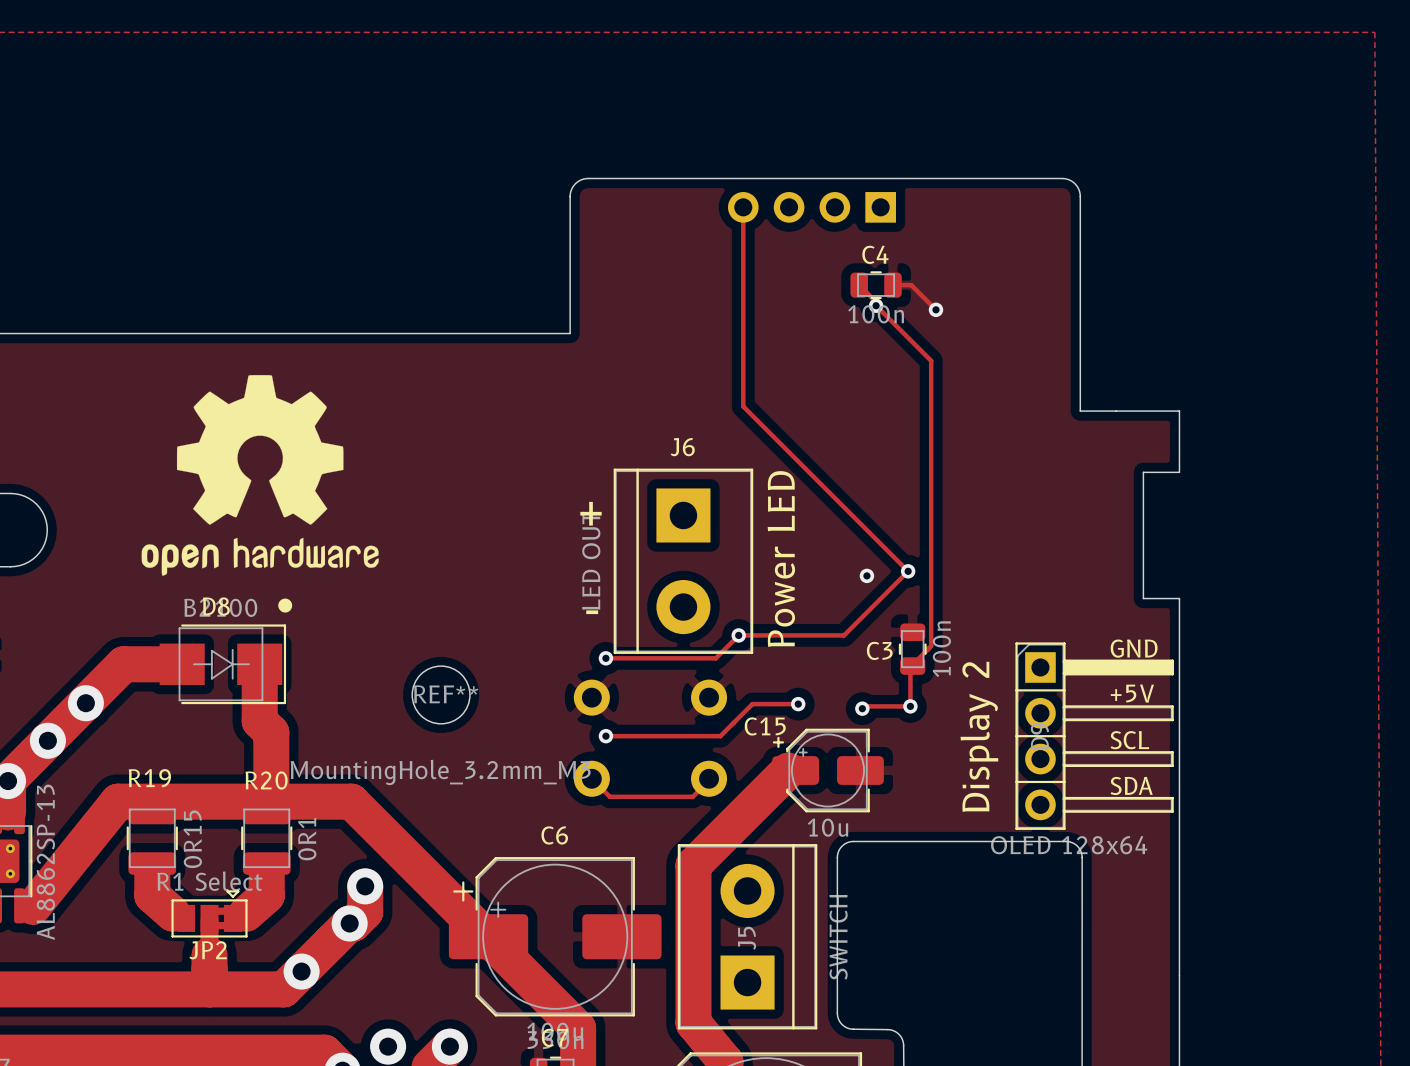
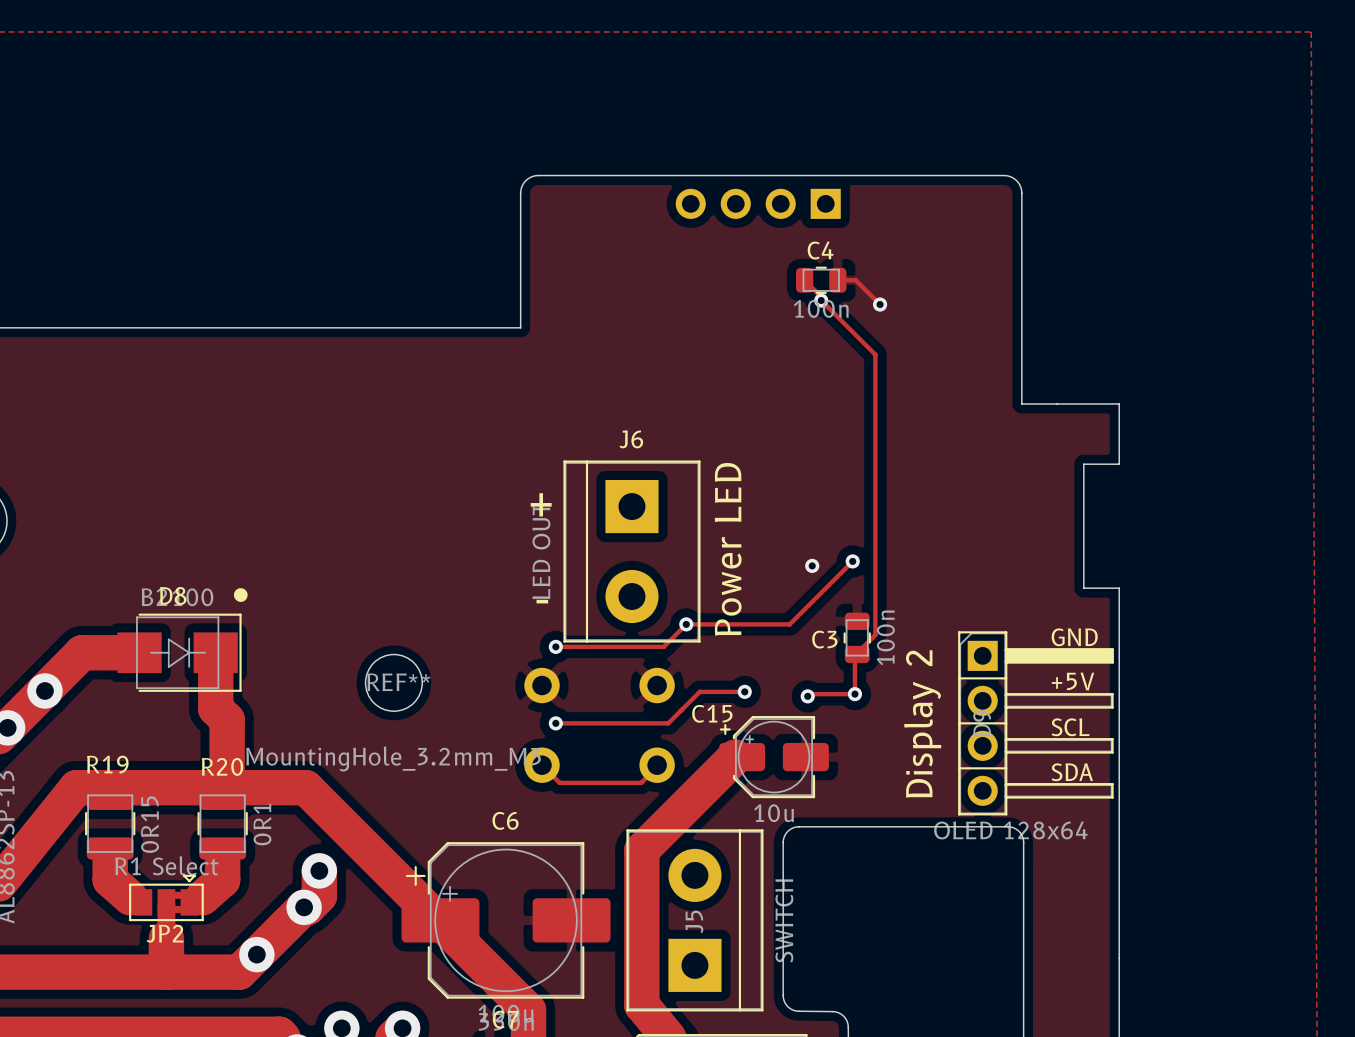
track: (743, 207) (743, 406) (908, 571) -> none
drawing: [141, 375, 379, 576] -> none

